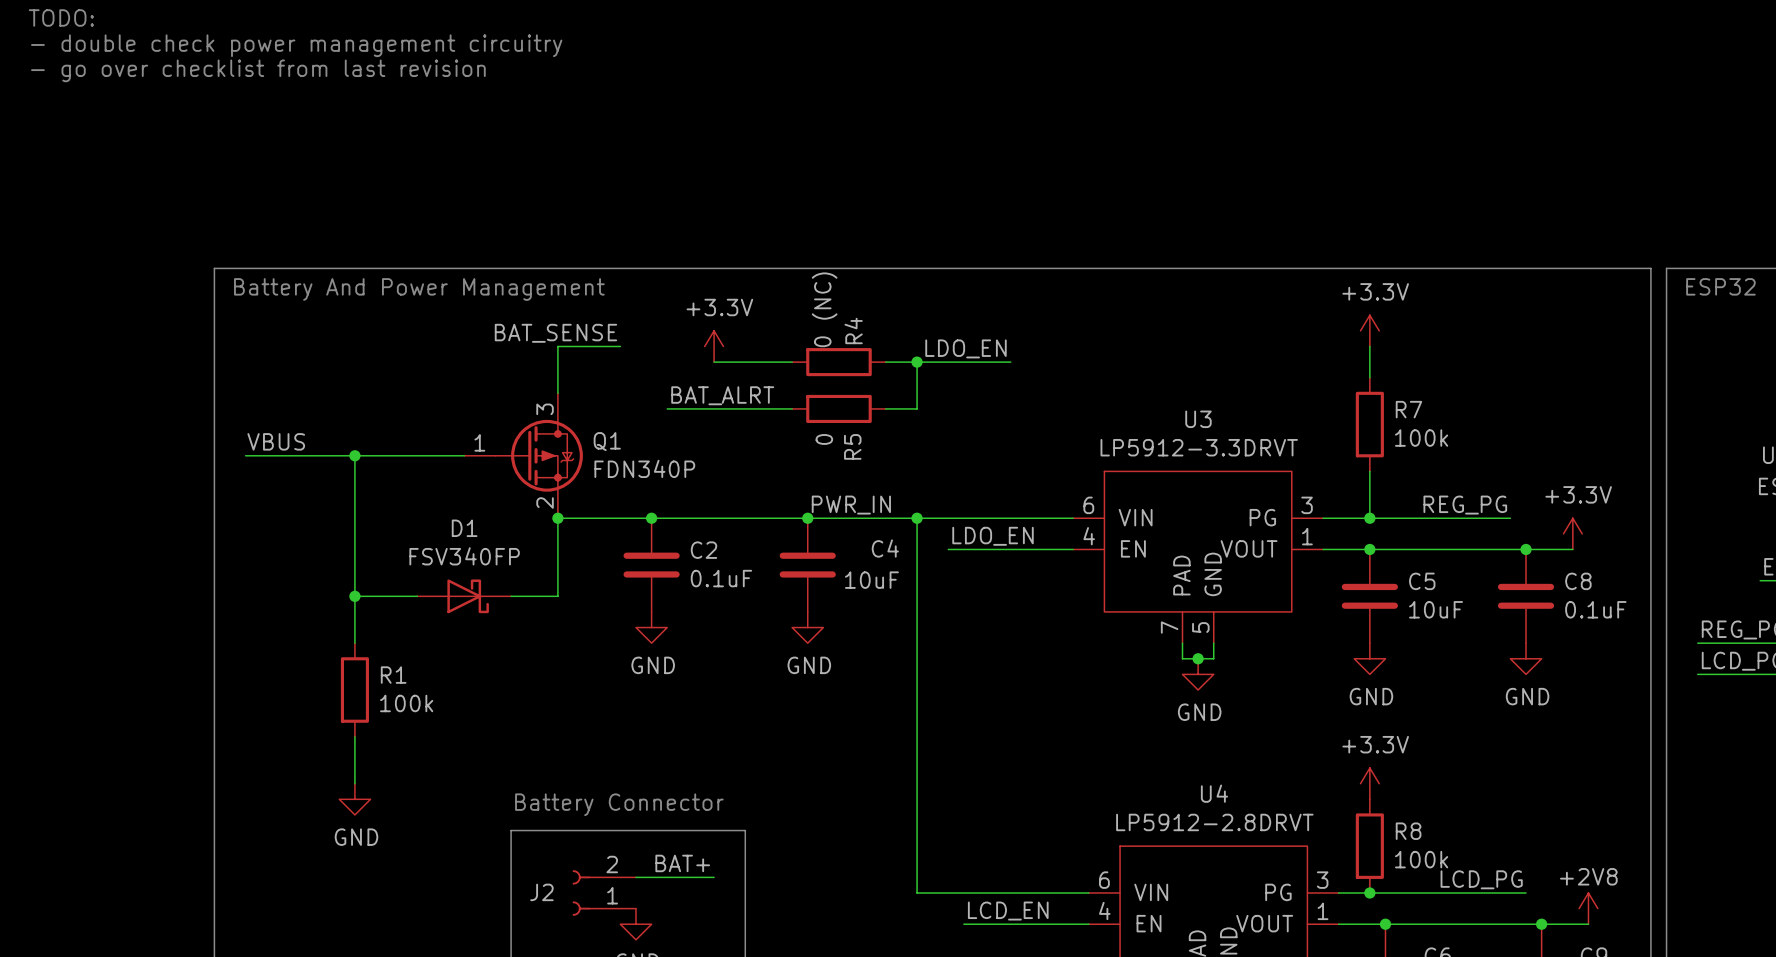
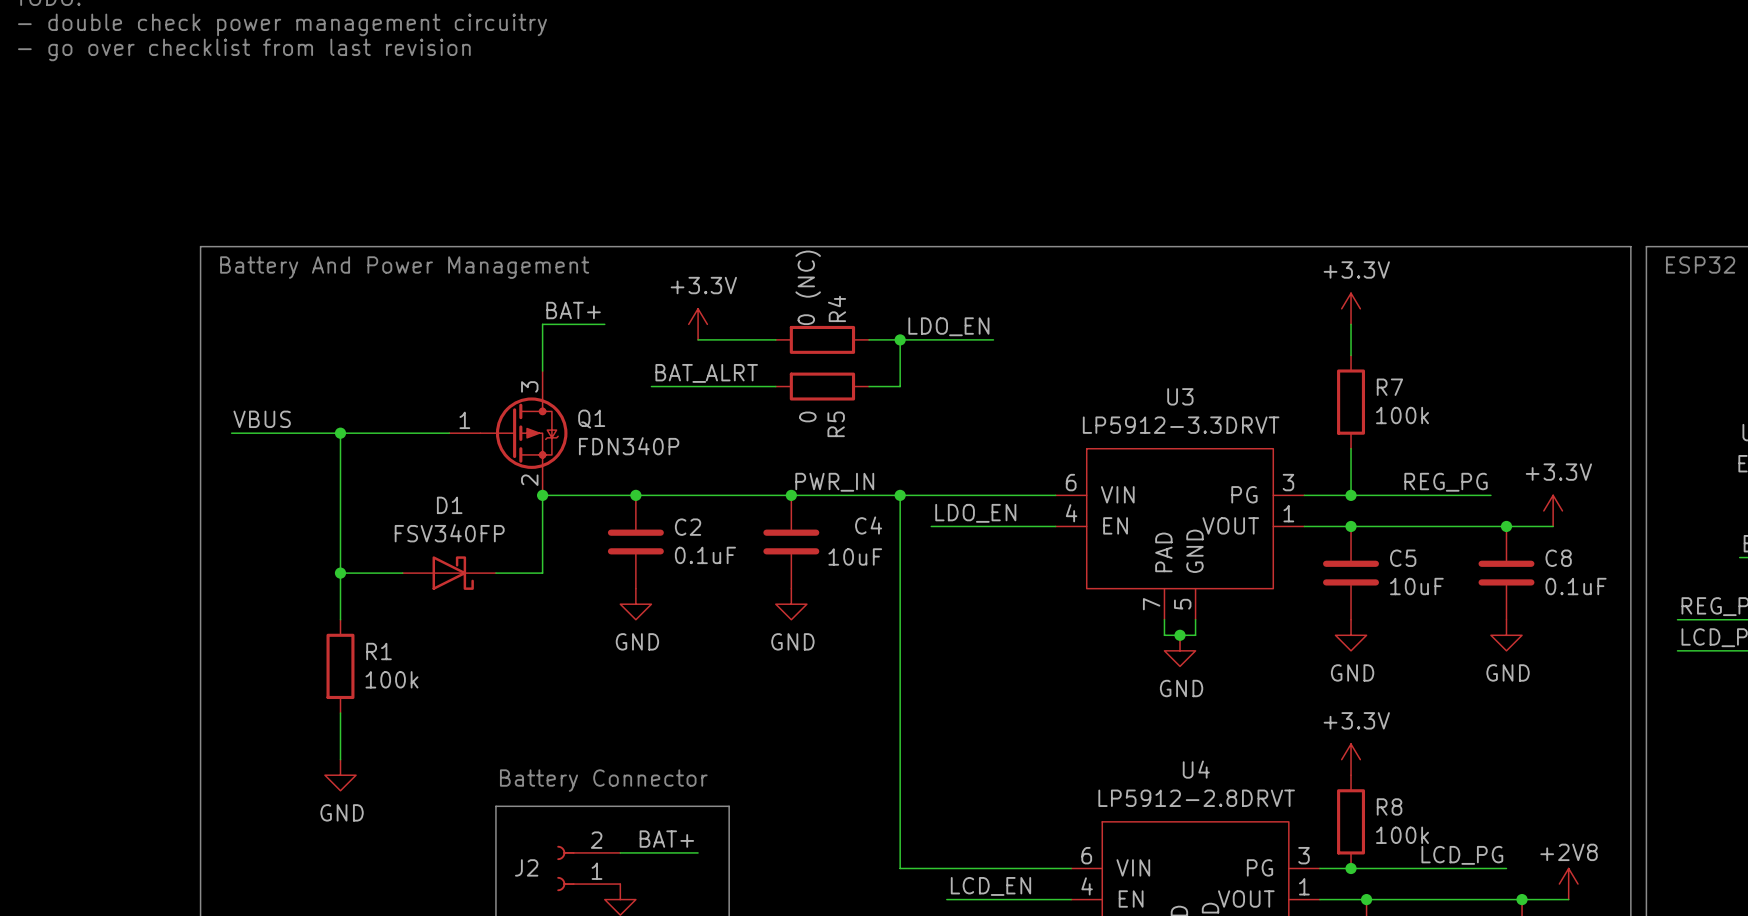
label: BAT_SENSE (555, 333) -> BAT+ (573, 310)

